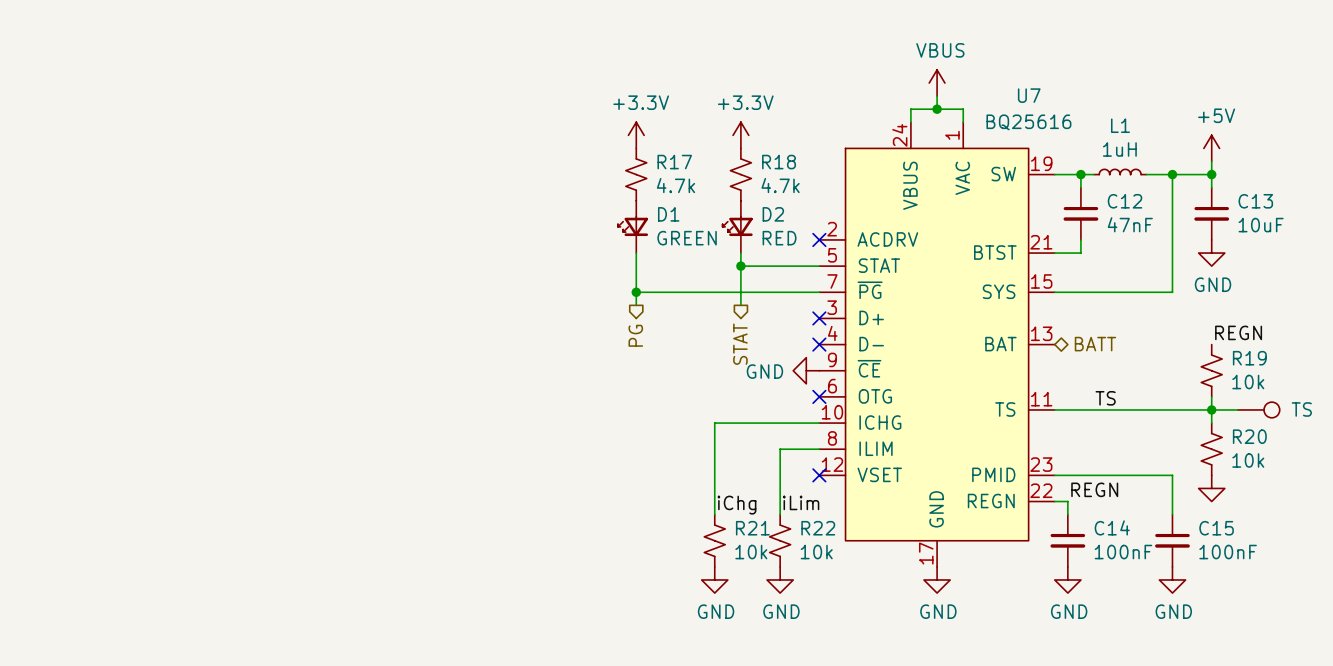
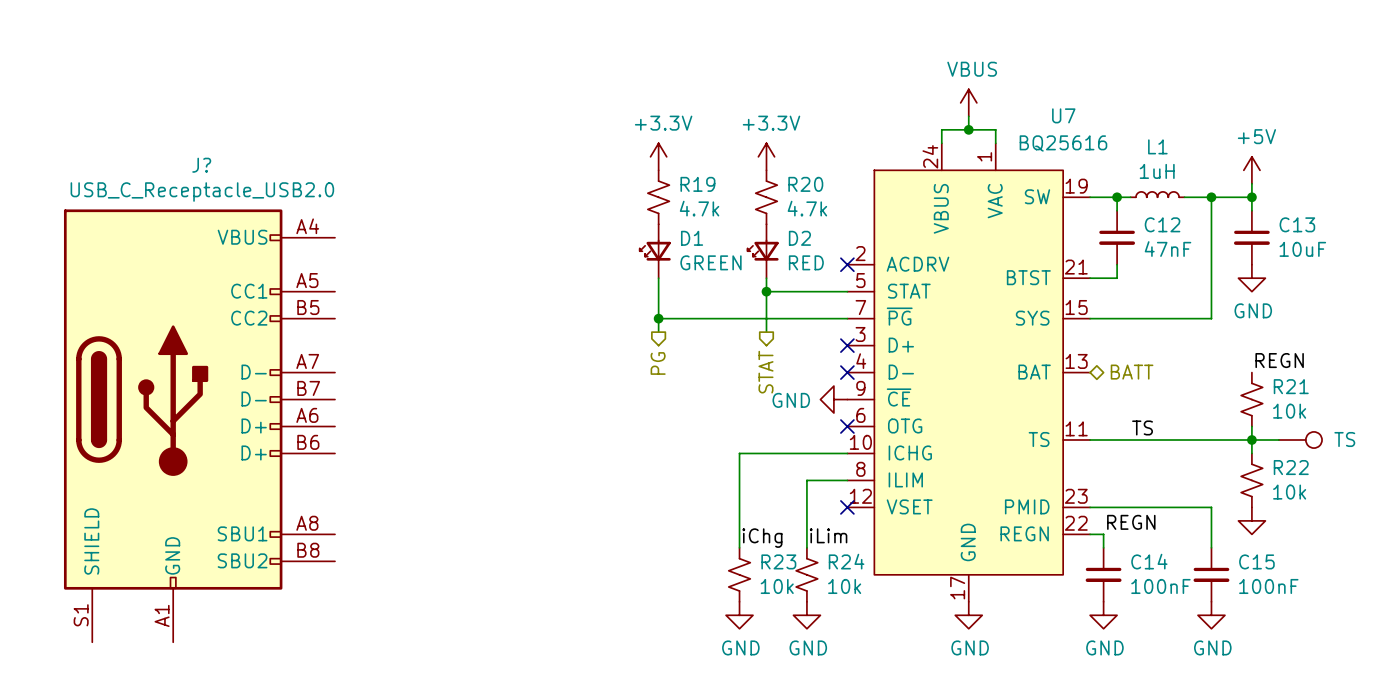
R17 name: R17 (674, 162) -> R19 (697, 184)
R18 name: R18 (779, 162) -> R20 (805, 184)
R19 name: R19 (1249, 358) -> R21 (1291, 386)
J?: none -> USB_C_Receptacle_USB2.0 (199, 425)
R20 name: R20 (1249, 436) -> R22 (1291, 467)
R21 name: R21 (752, 528) -> R23 (778, 561)
R22 name: R22 (818, 528) -> R24 (846, 561)

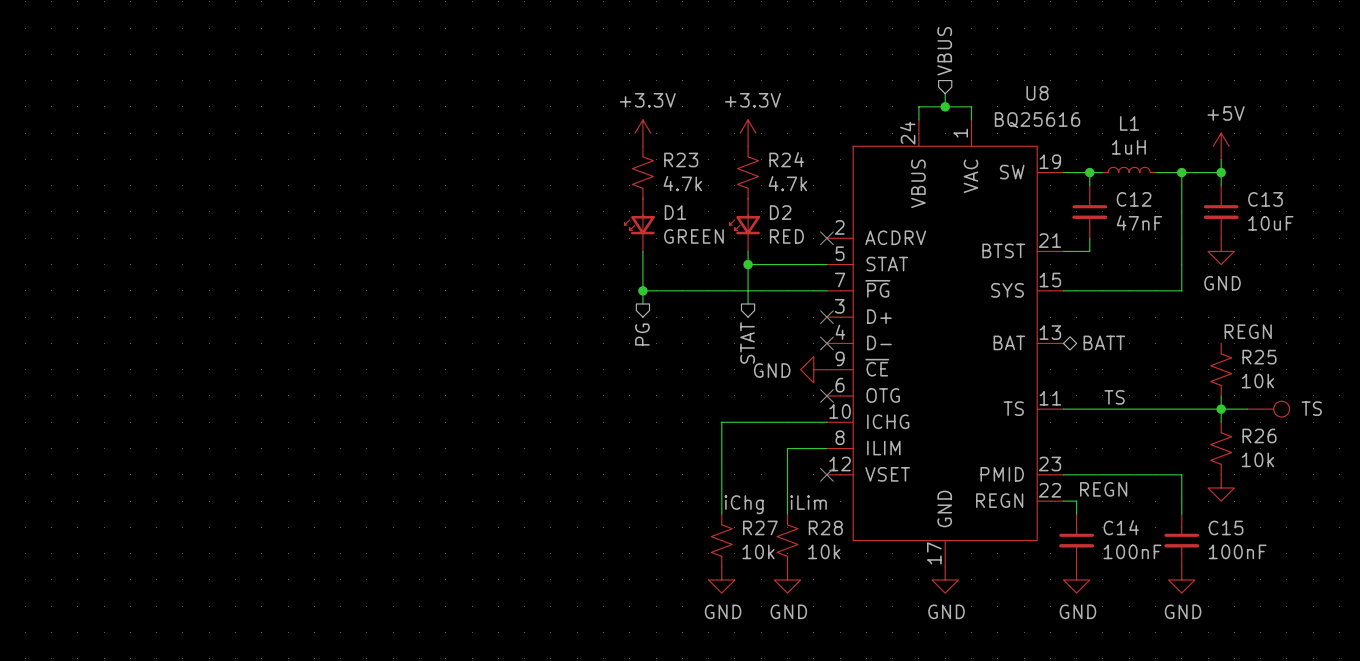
hierarchical label: none -> VBUS (944, 51)
power symbol: VBUS (968, 102) -> none
U7 name: U7 (1063, 115) -> U8 (1037, 93)
R19 name: R19 (697, 184) -> R23 (681, 159)
R20 name: R20 (805, 184) -> R24 (786, 159)
R21 name: R21 (1291, 386) -> R25 (1259, 357)
J?: USB_C_Receptacle_USB2.0 (199, 425) -> none
R22 name: R22 (1291, 467) -> R26 (1259, 435)
R23 name: R23 (778, 561) -> R27 (760, 527)
R24 name: R24 (846, 561) -> R28 (825, 527)

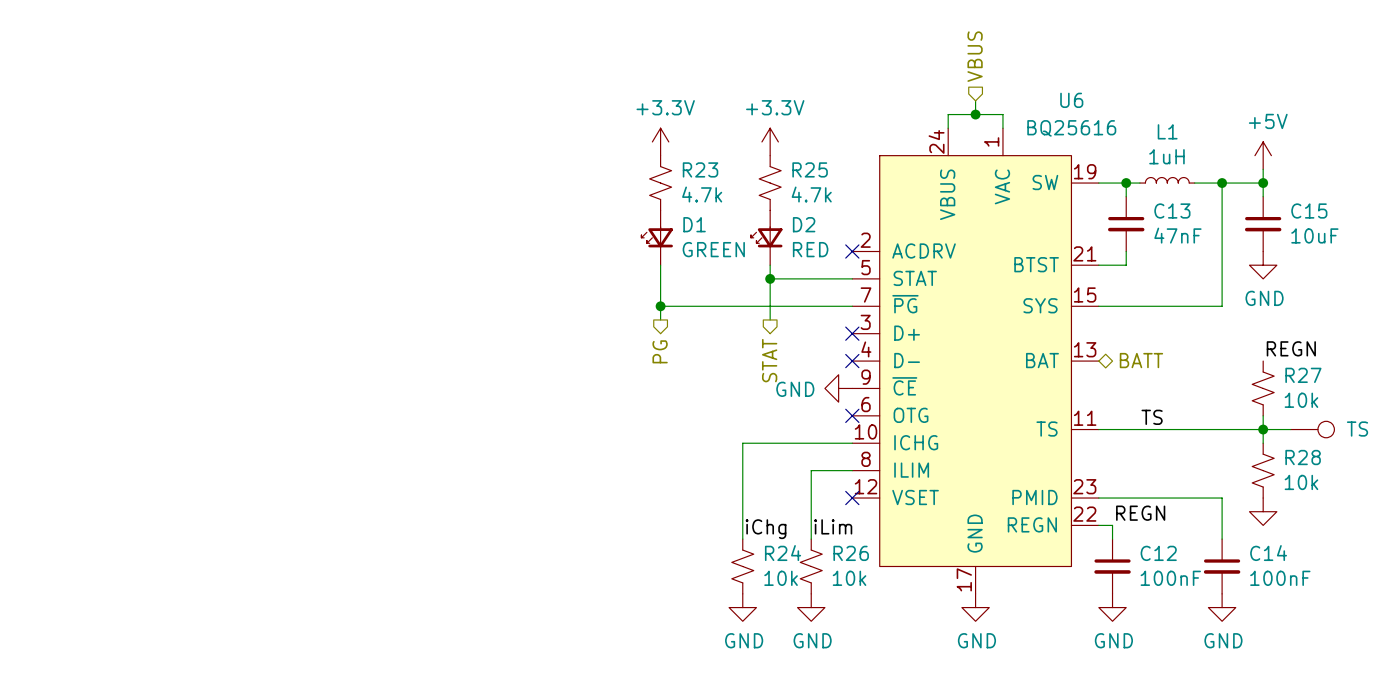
U8 name: U8 (1037, 93) -> U6 (1071, 100)
R24 name: R24 (786, 159) -> R25 (810, 169)
C12 name: C12 (1134, 199) -> C13 (1172, 211)
C13 name: C13 (1265, 199) -> C15 (1309, 211)
R25 name: R25 (1259, 357) -> R27 (1303, 375)
R26 name: R26 (1259, 435) -> R28 (1303, 457)
R27 name: R27 (760, 527) -> R24 (783, 553)
R28 name: R28 (825, 527) -> R26 (851, 553)
C14 name: C14 (1121, 527) -> C12 (1158, 553)
C15 name: C15 (1226, 527) -> C14 (1268, 553)

